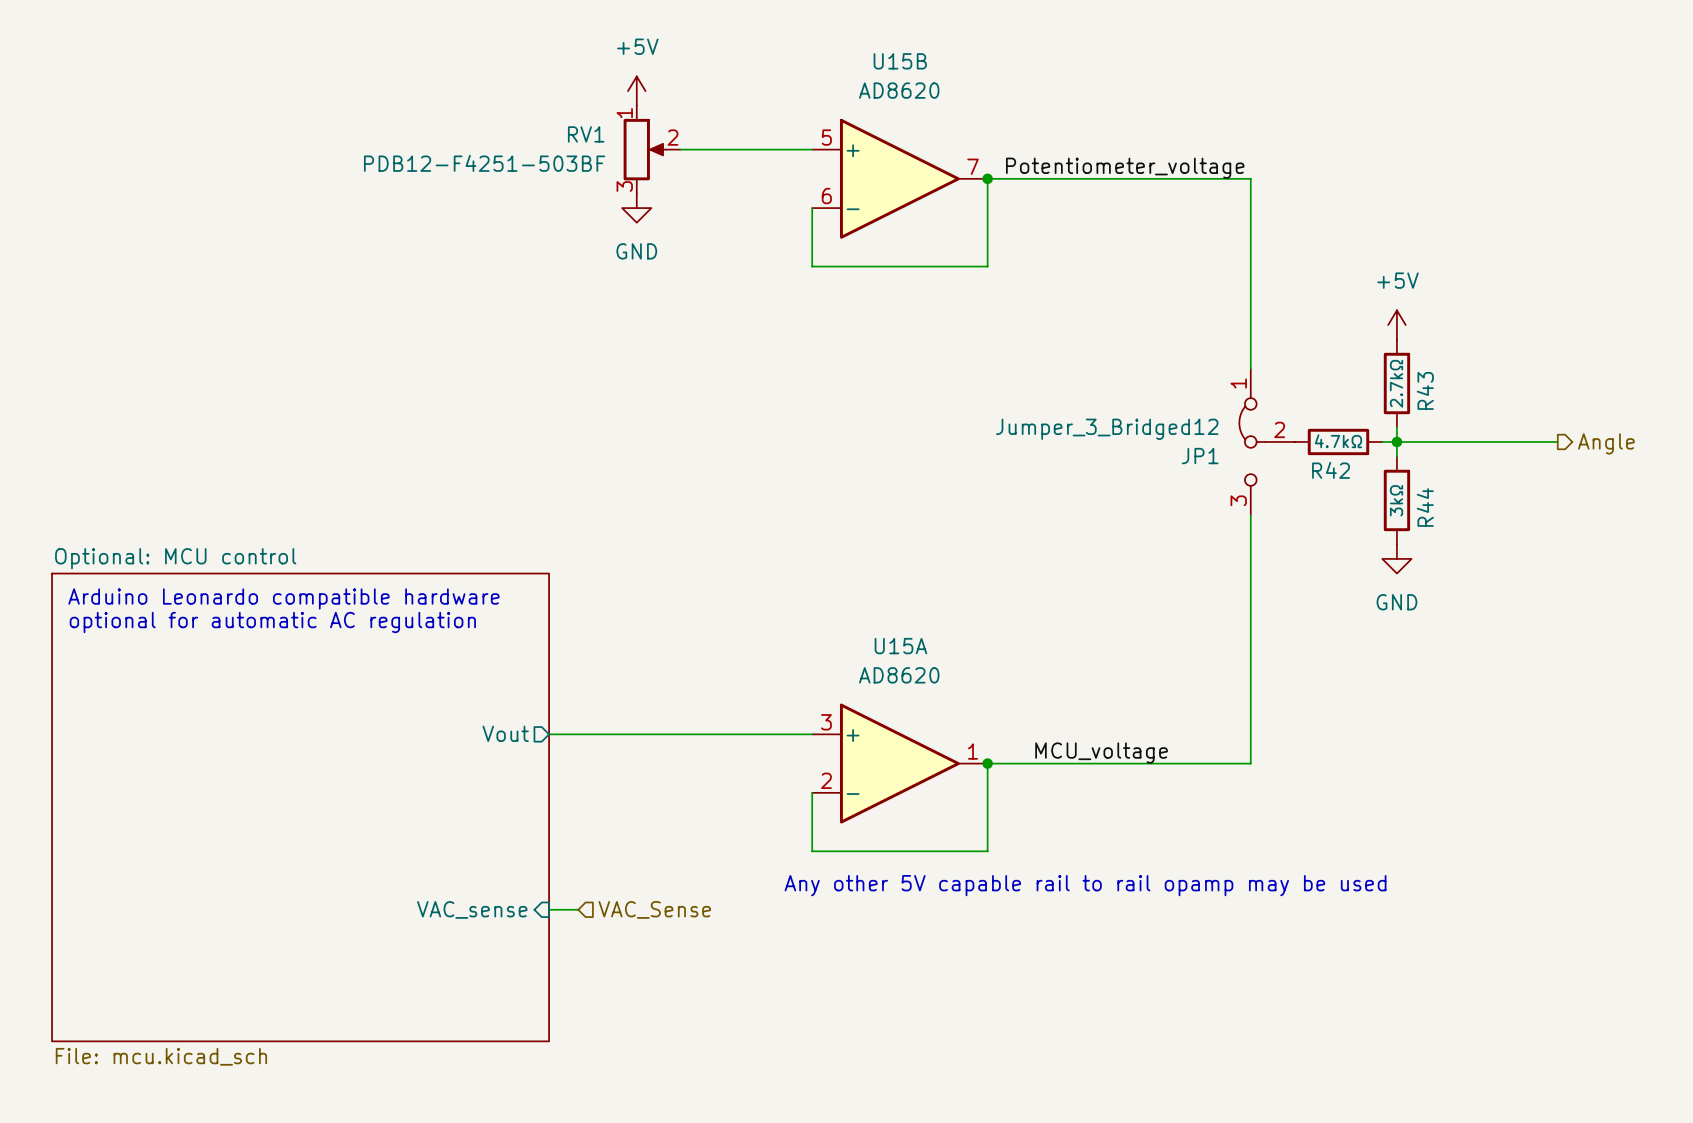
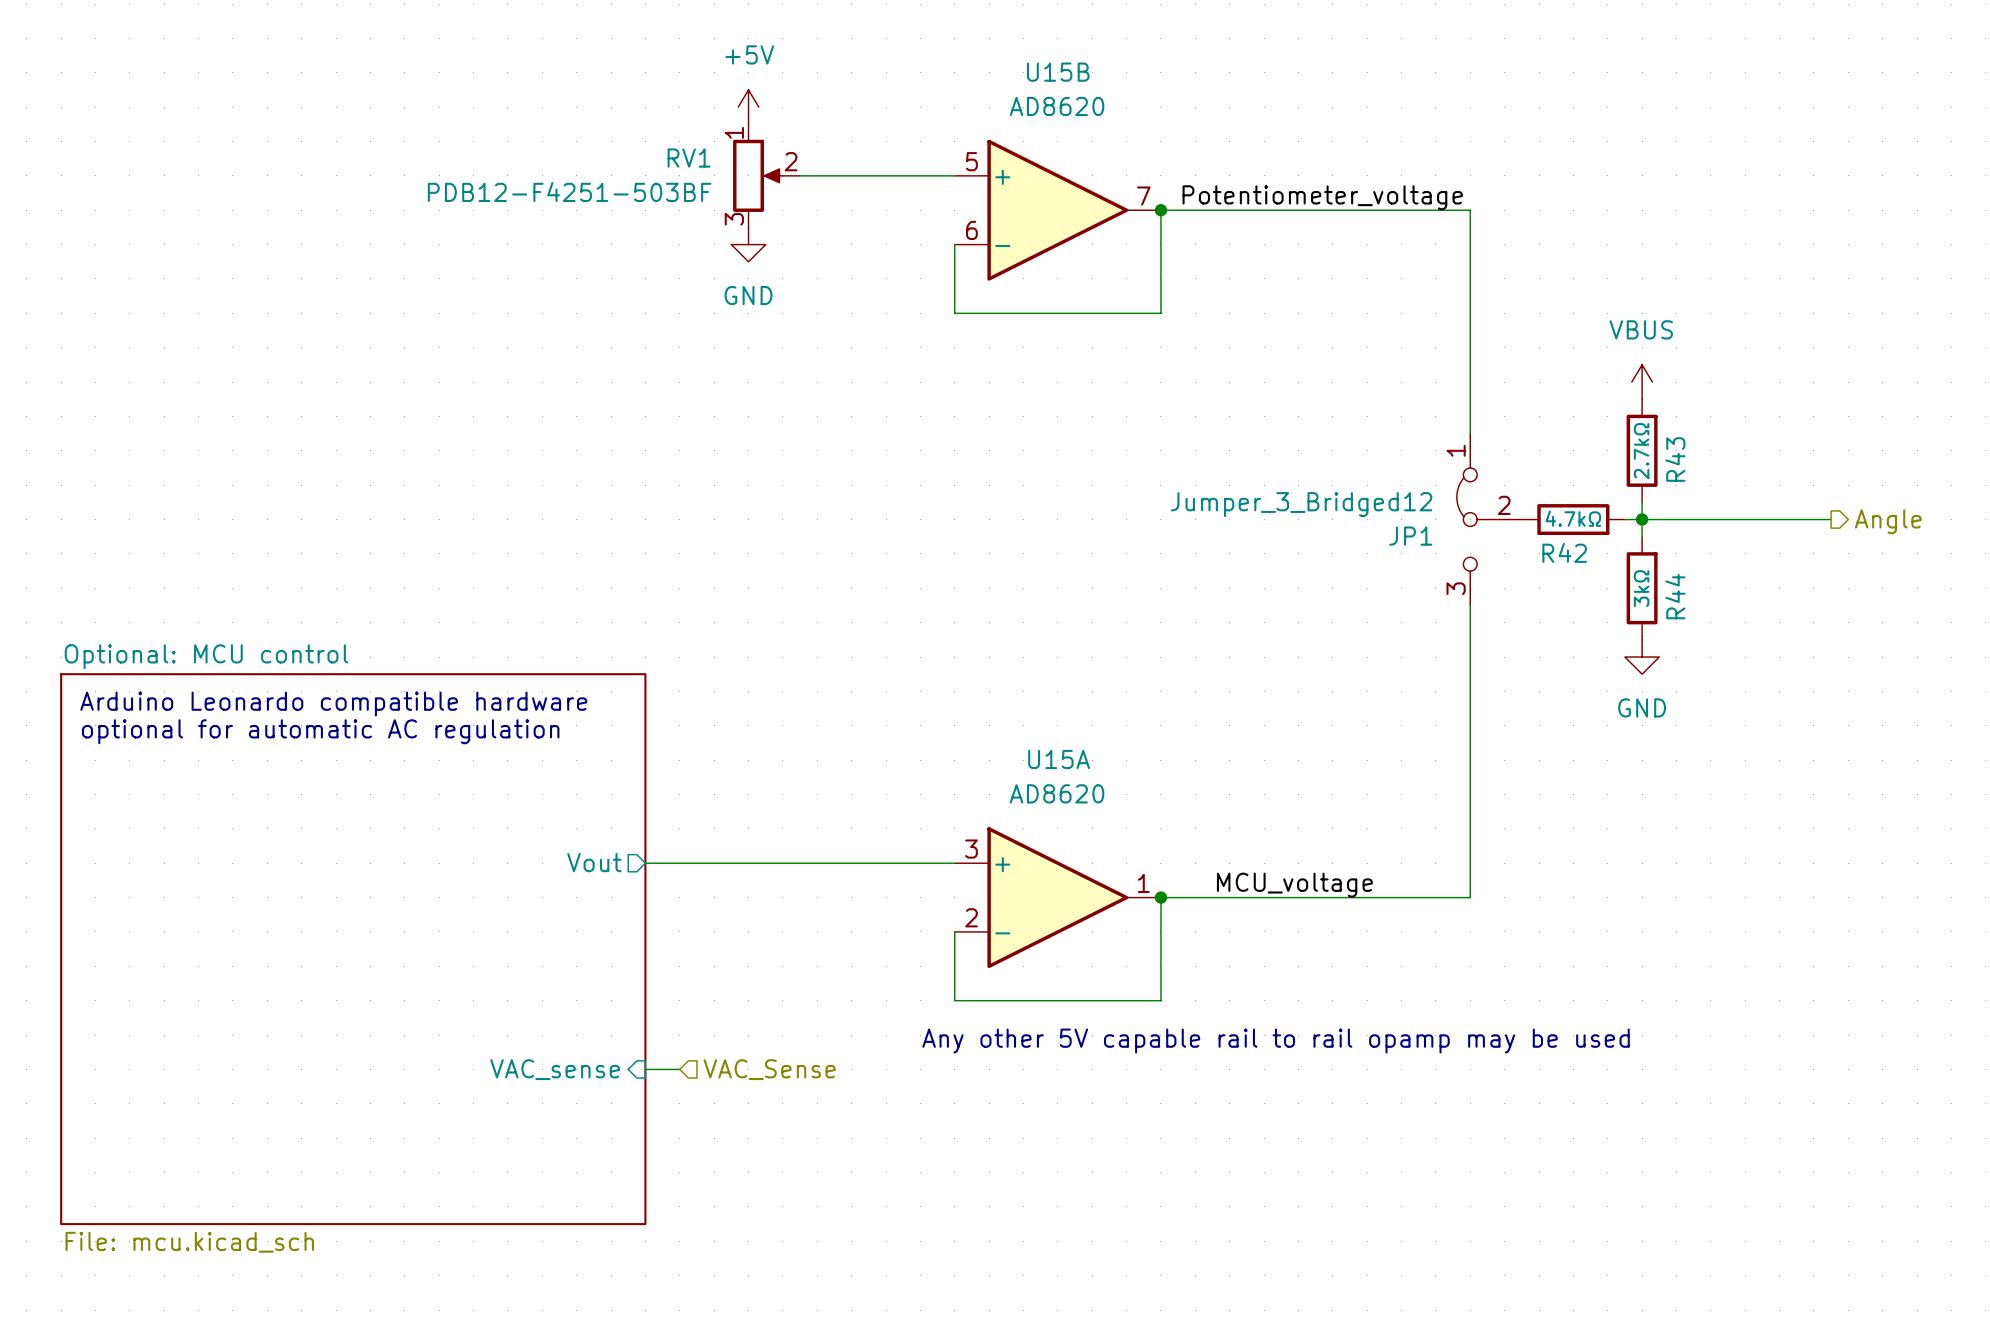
power symbol: +5V (1396, 325) -> VBUS (1642, 382)

